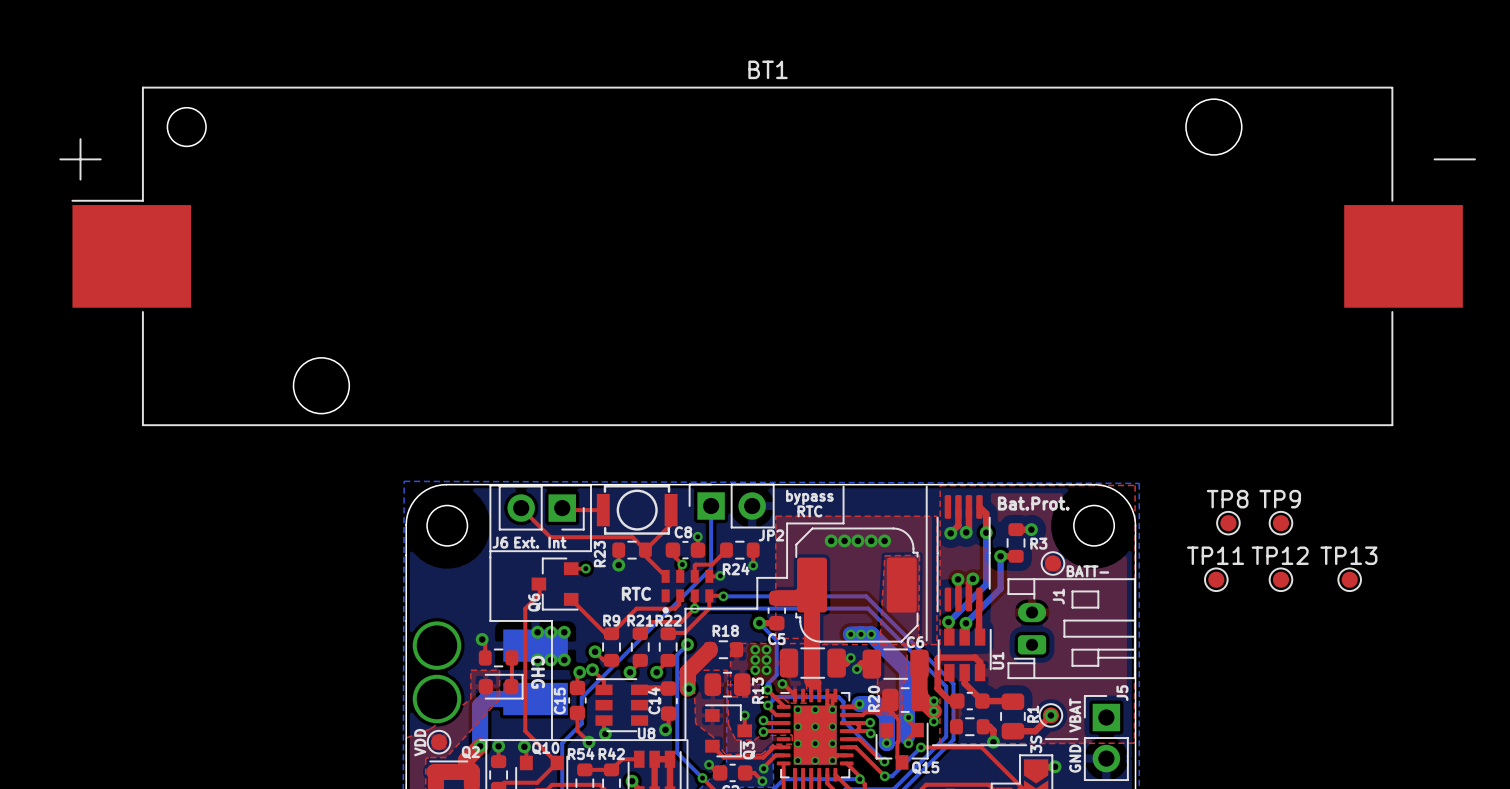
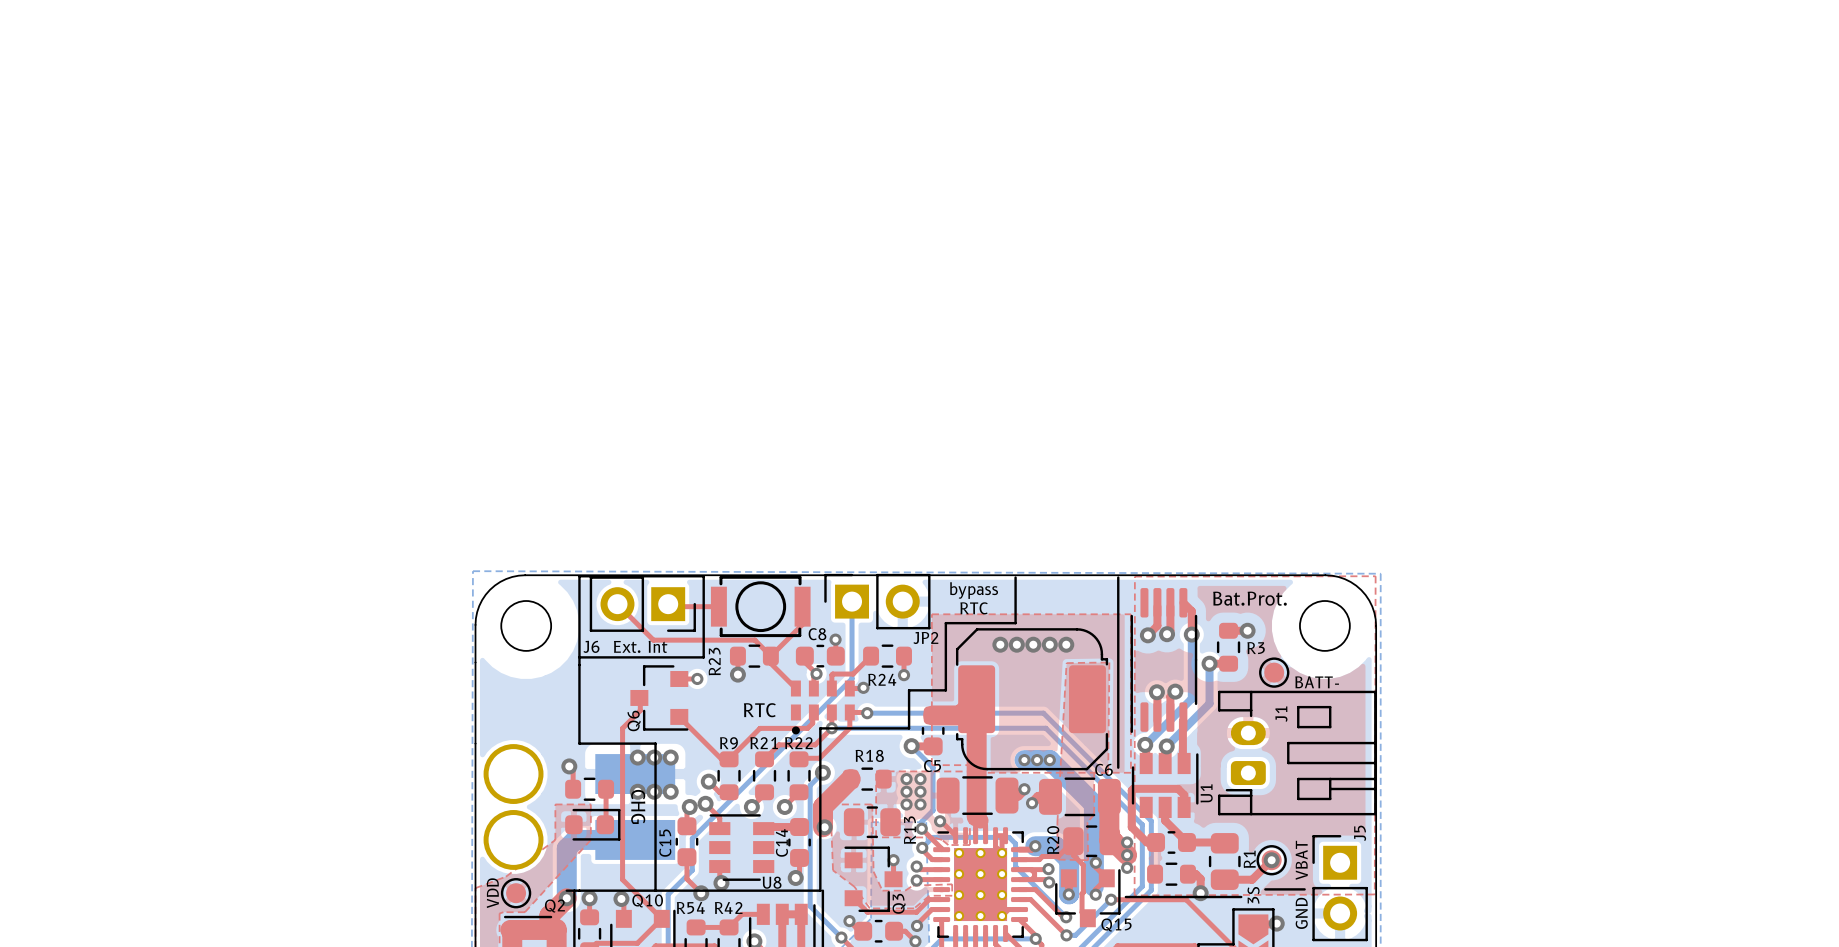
BT1: (767, 256) -> none
TP8: (1228, 523) -> none
TP9: (1280, 523) -> none
TP11: (1216, 579) -> none
TP12: (1280, 579) -> none
TP13: (1349, 579) -> none

